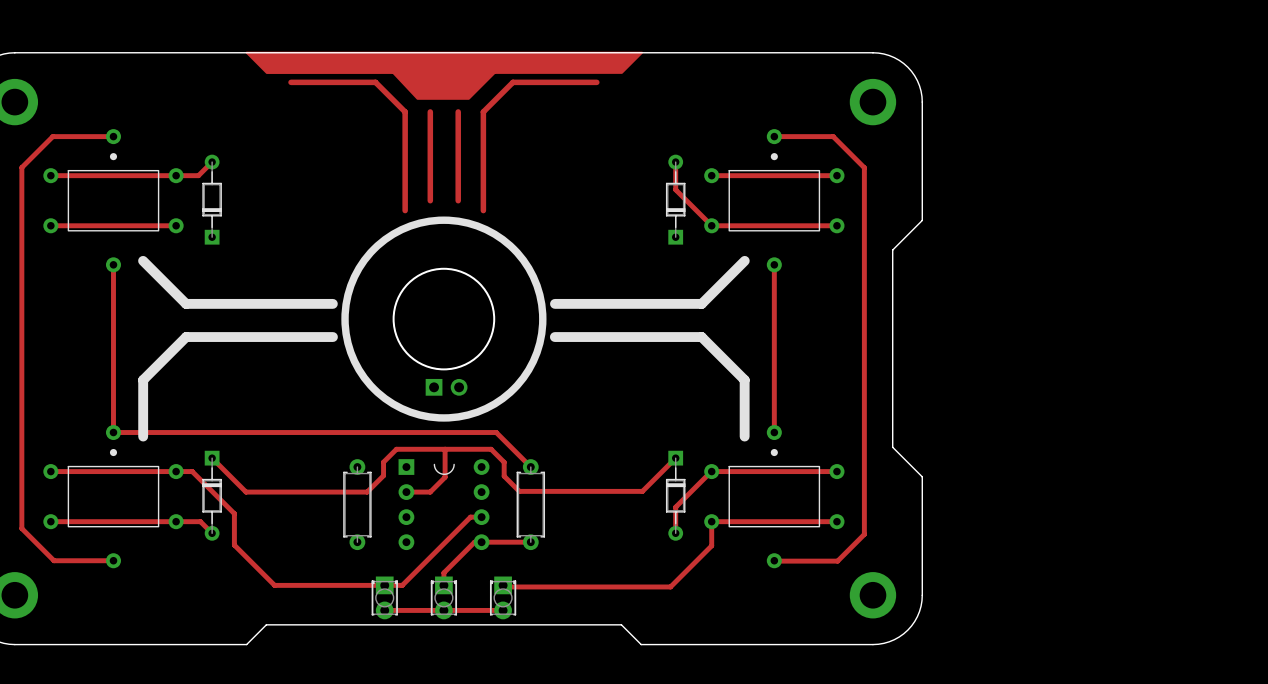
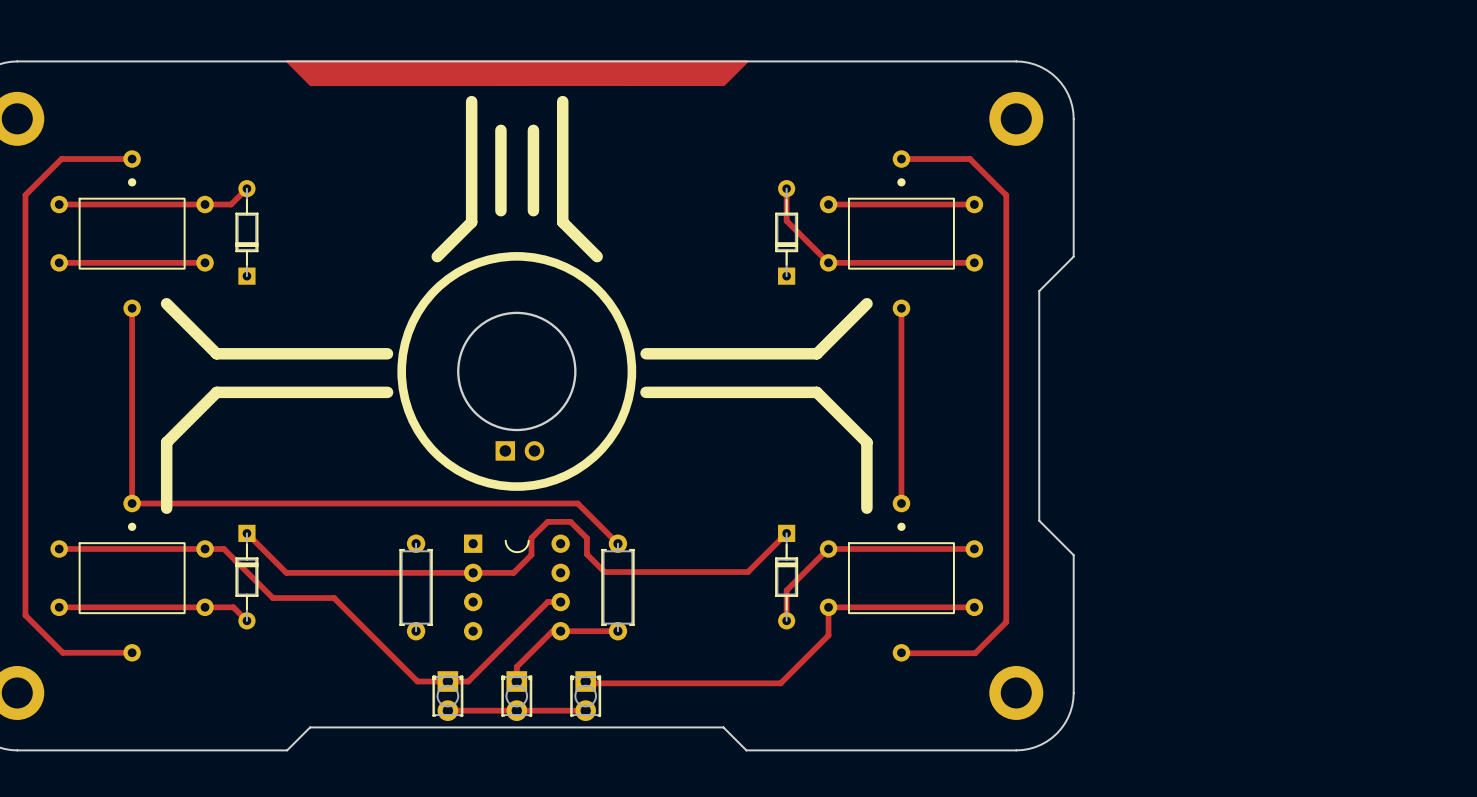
drawing: [389, 68, 499, 100] -> none
track: (291, 82) (375, 82) (405, 111) (405, 210) -> none
track: (596, 82) (512, 82) (483, 111) (483, 210) -> none
line: none -> (471, 101) (471, 222) (437, 256)
line: none -> (562, 101) (562, 222) (597, 256)
track: (430, 111) (430, 200) -> none
line: none -> (500, 130) (500, 210)
track: (458, 111) (458, 200) -> none
line: none -> (533, 130) (533, 210)
track: (445, 449) (445, 477) (430, 492) -> (571, 523) (547, 521) (531, 538) (531, 554) (513, 572) (500, 572)
track: (491, 449) (396, 449) (383, 462) (383, 475) (367, 492) -> (473, 572) (427, 572)
track: (234, 513) (234, 545) (274, 585) (358, 585) -> (272, 598) (334, 598) (417, 681)

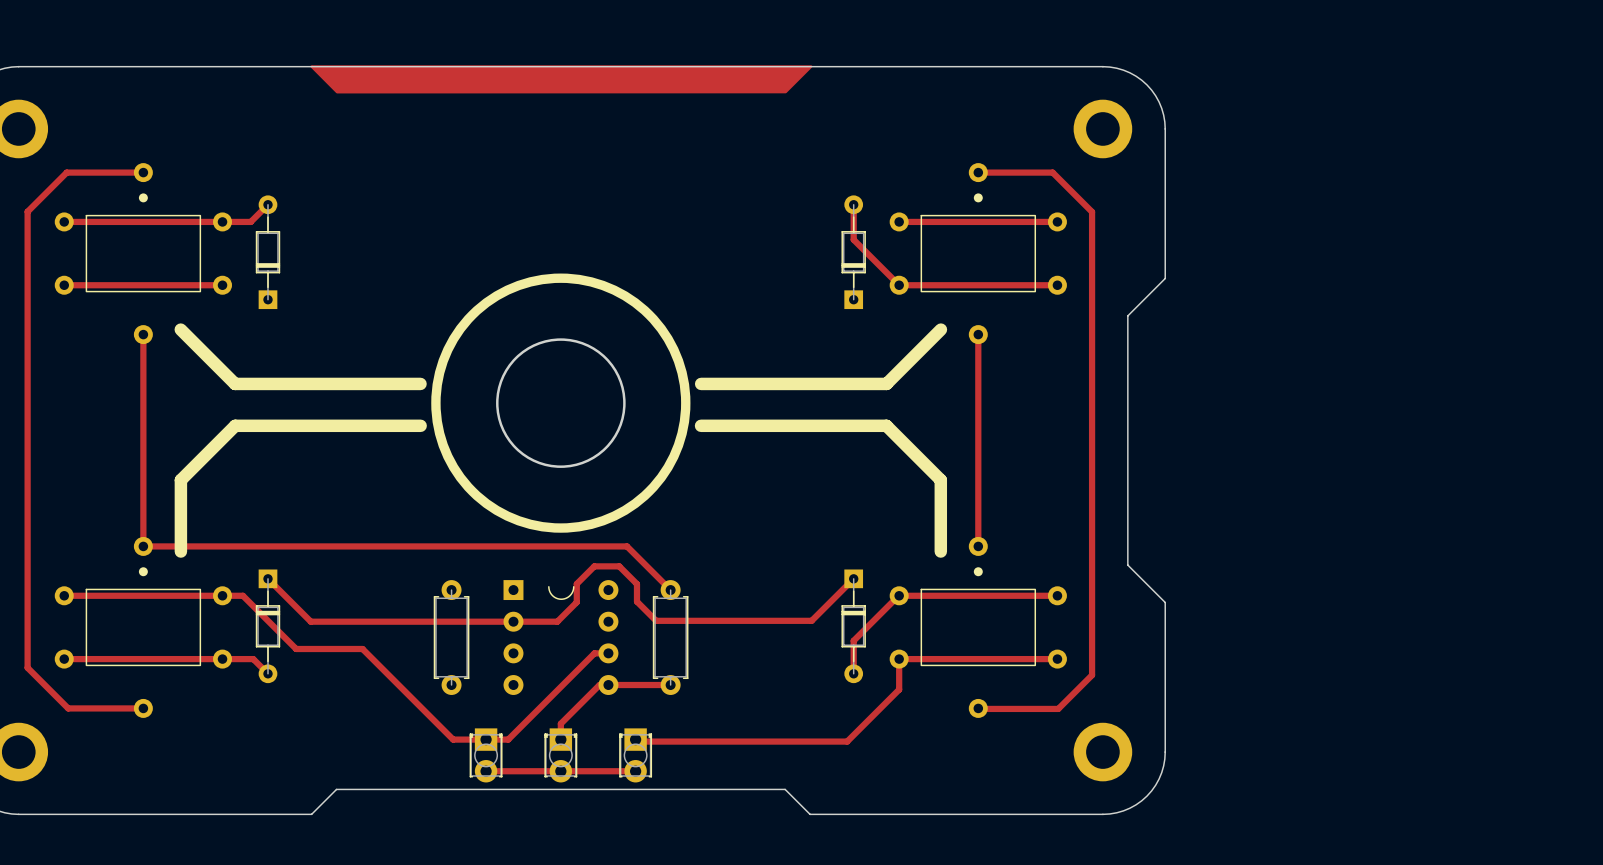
line: (471, 101) (471, 222) (437, 256) -> none
line: (562, 101) (562, 222) (597, 256) -> none
line: (500, 130) (500, 210) -> none
line: (533, 130) (533, 210) -> none
part: (519, 450) -> none

